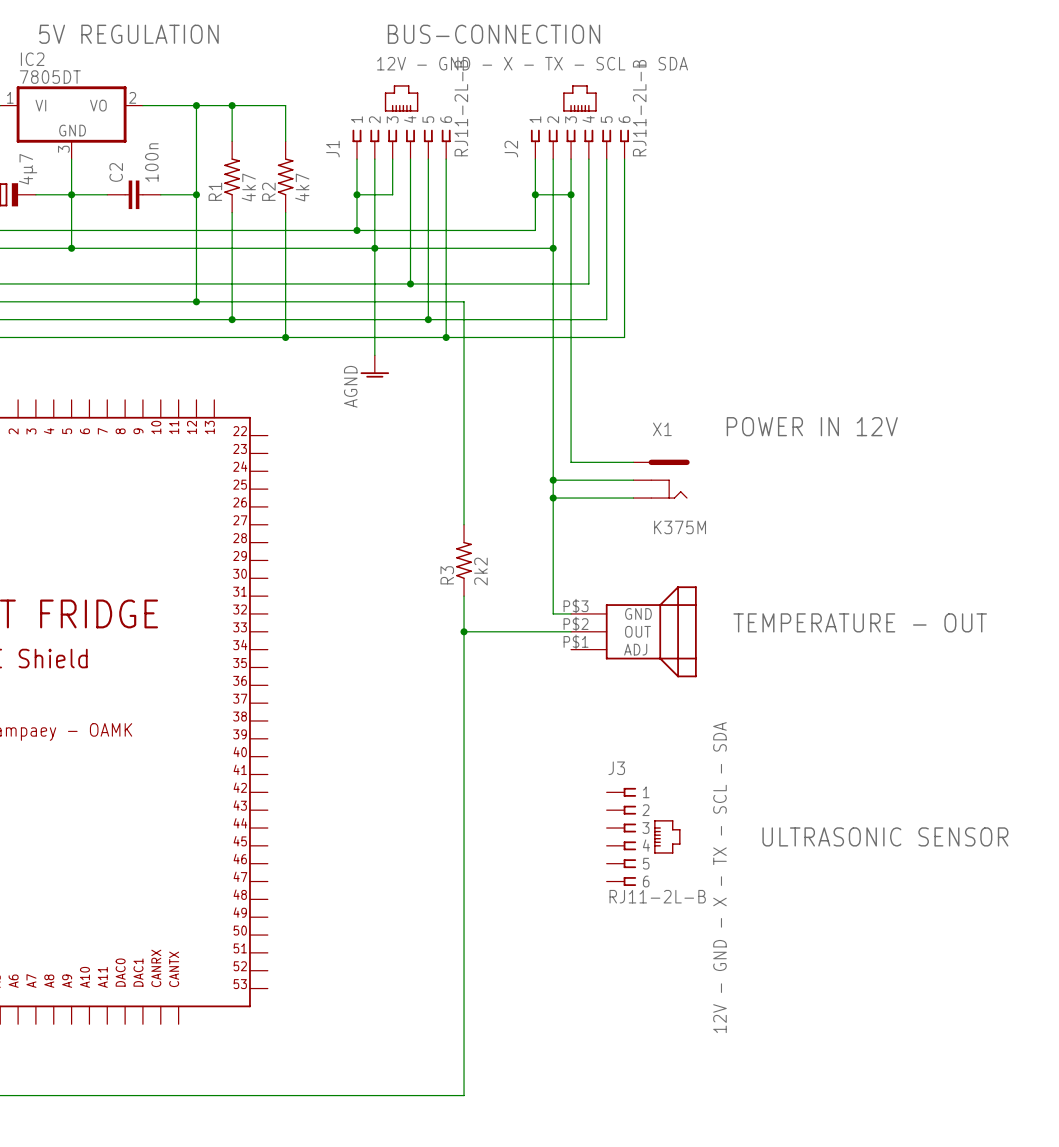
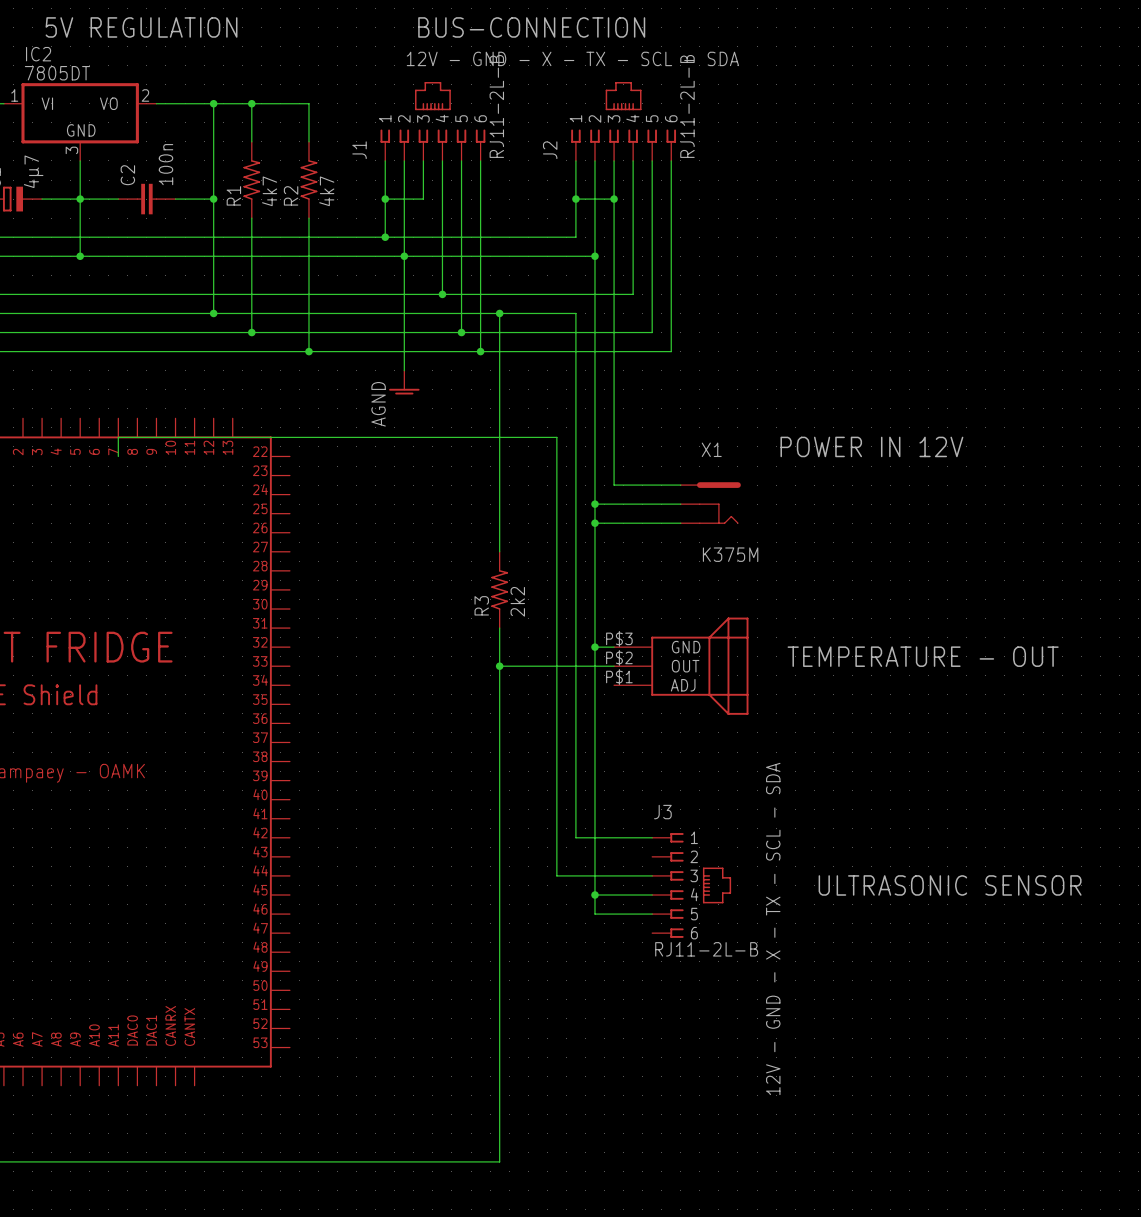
wire: none -> (499, 313) (575, 313) (575, 837) (652, 837)
junction: none -> (499, 313)
wire: none -> (118, 456) (118, 437) (556, 437) (556, 875) (652, 875)
wire: none -> (594, 647) (594, 914) (652, 914)
junction: none -> (594, 647)
wire: none -> (594, 895) (652, 895)
junction: none -> (594, 895)

